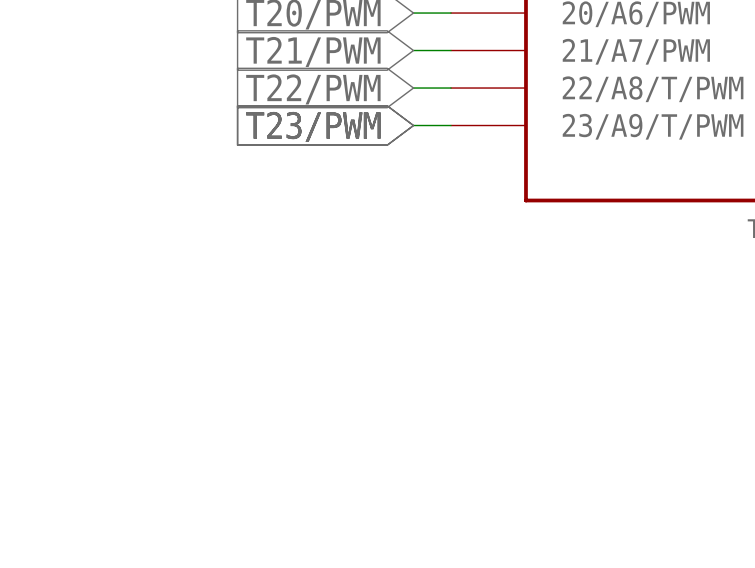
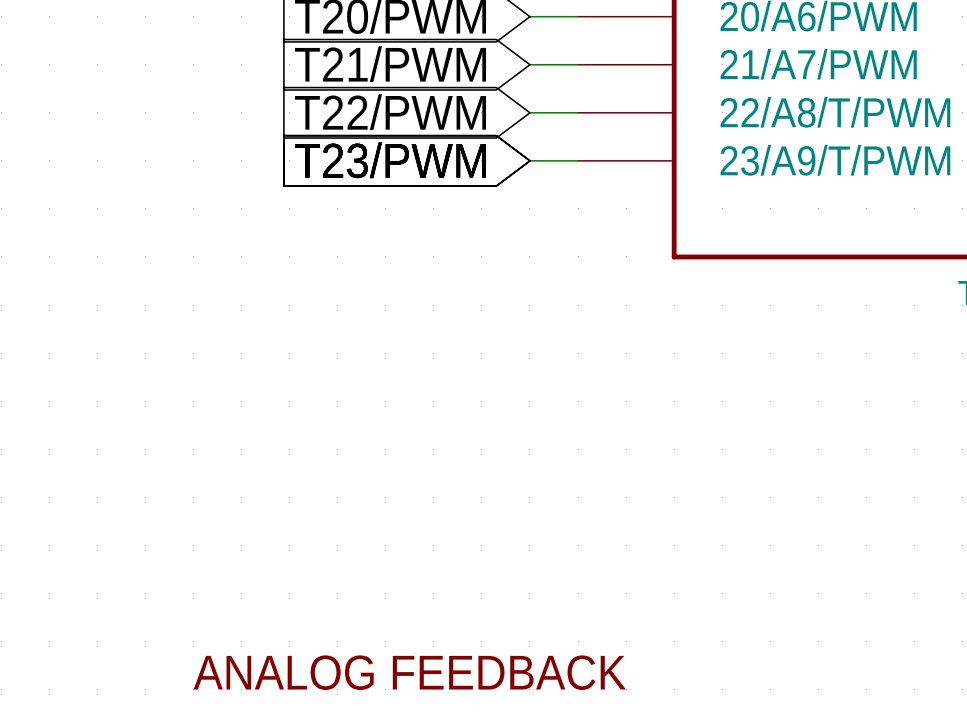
text: none -> ANALOG FEEDBACK (409, 672)

